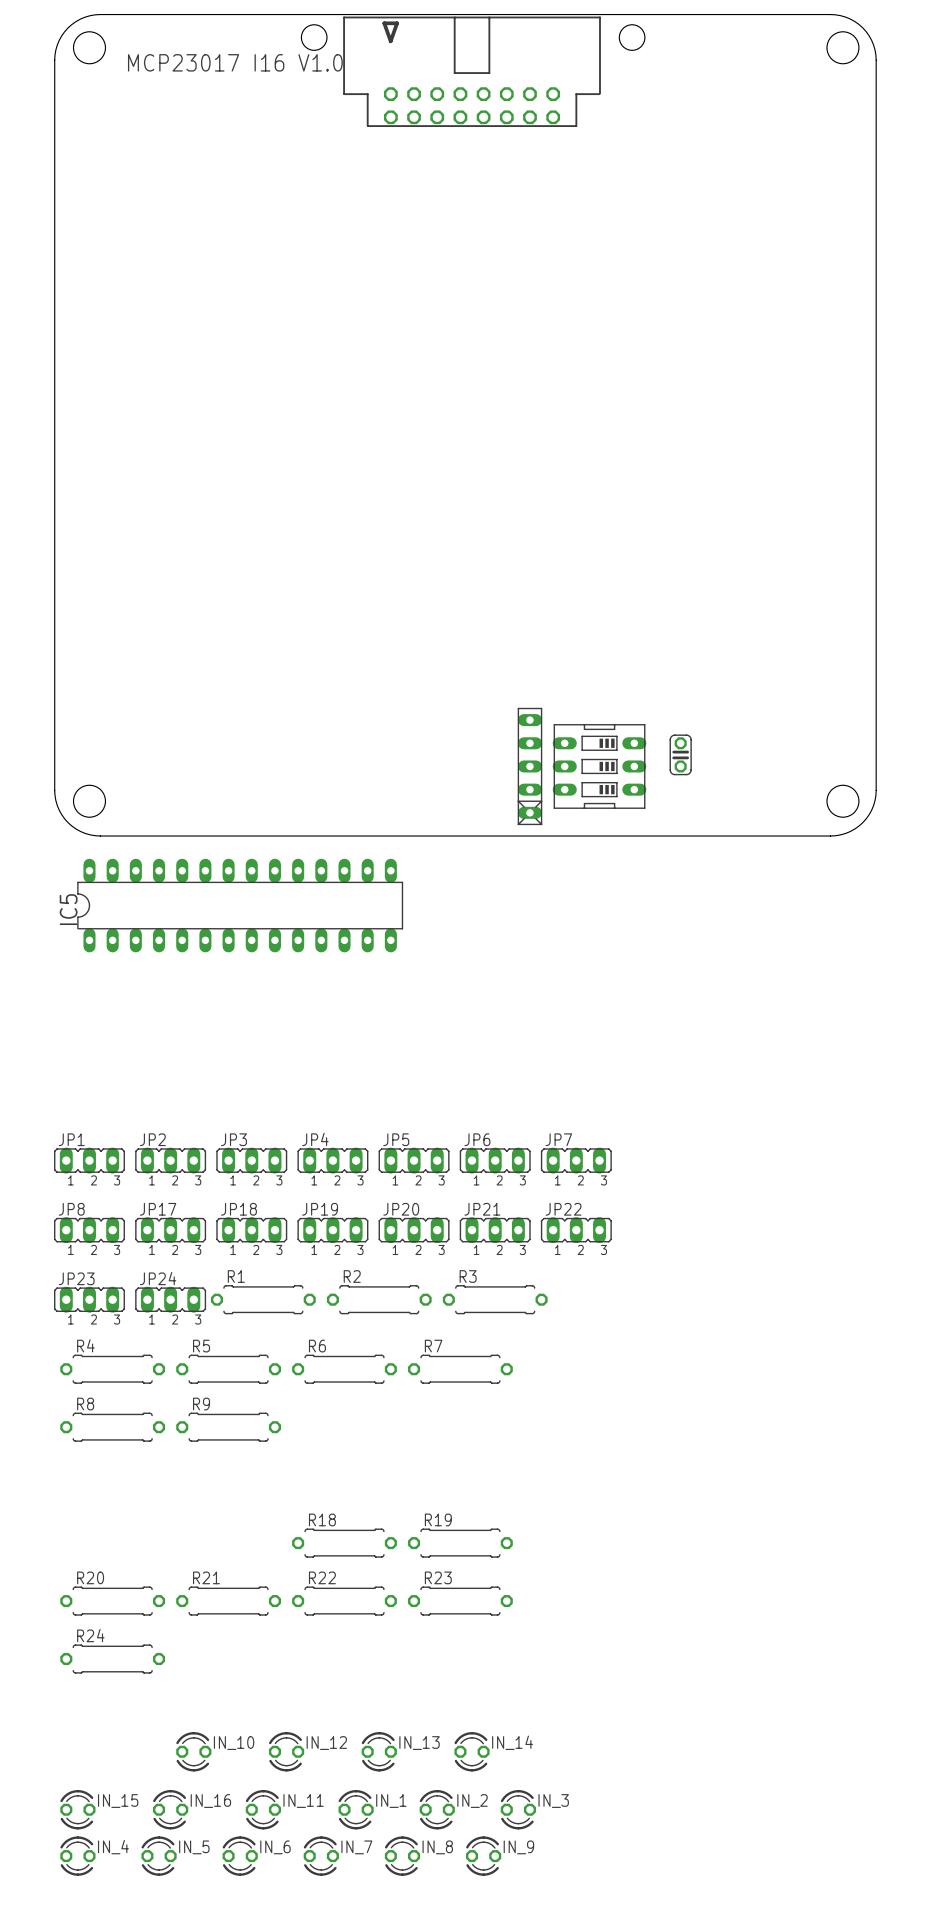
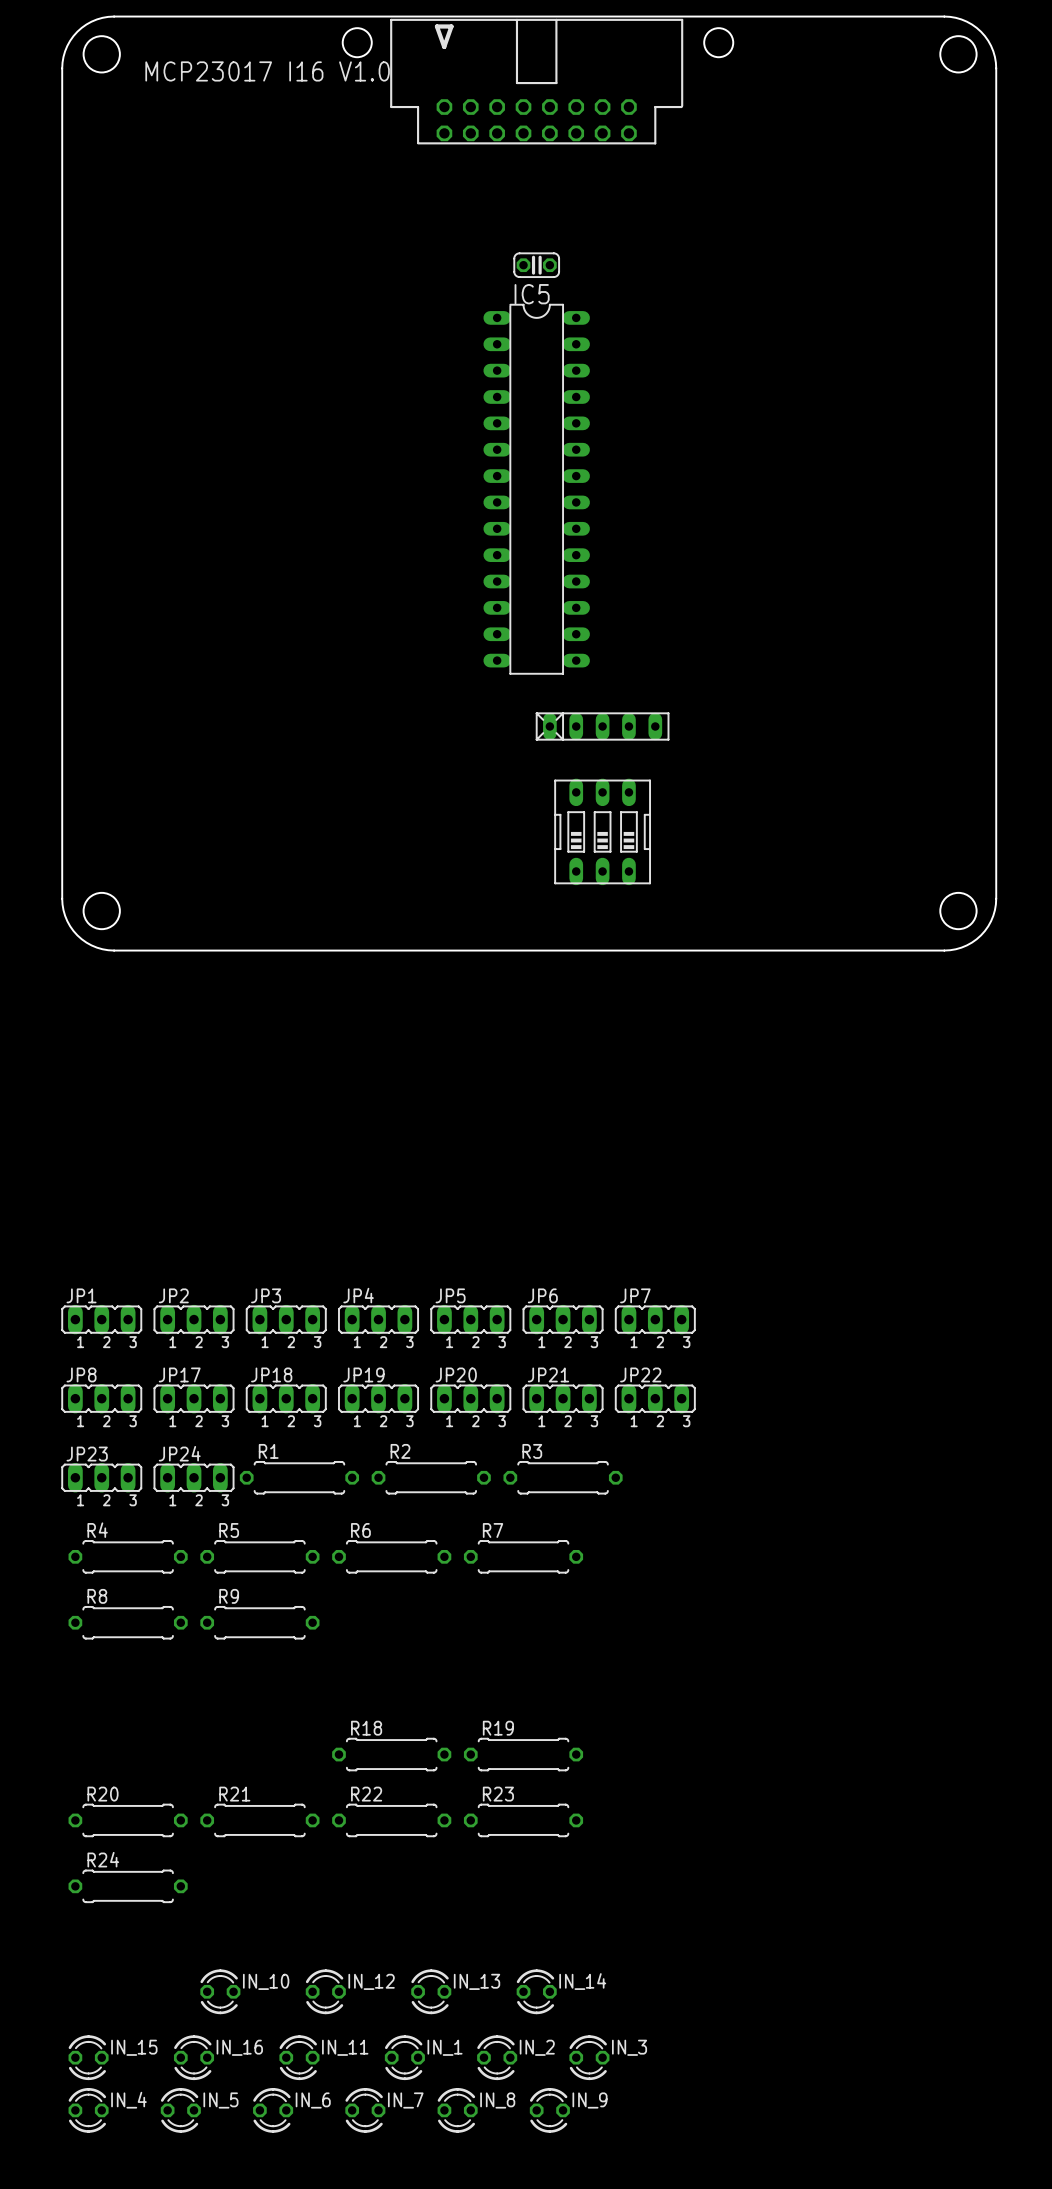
part: none -> (536, 265)
part: (680, 754) -> none
part rotation: 0° (529, 766) -> 90° clockwise (602, 726)
part position: (529, 766) -> (602, 726)
part rotation: 0° (599, 766) -> 90° clockwise (602, 831)
part position: (599, 766) -> (602, 831)
IC5 rotation: 0° (240, 905) -> 90° clockwise (536, 489)
IC5 position: (240, 905) -> (536, 489)

